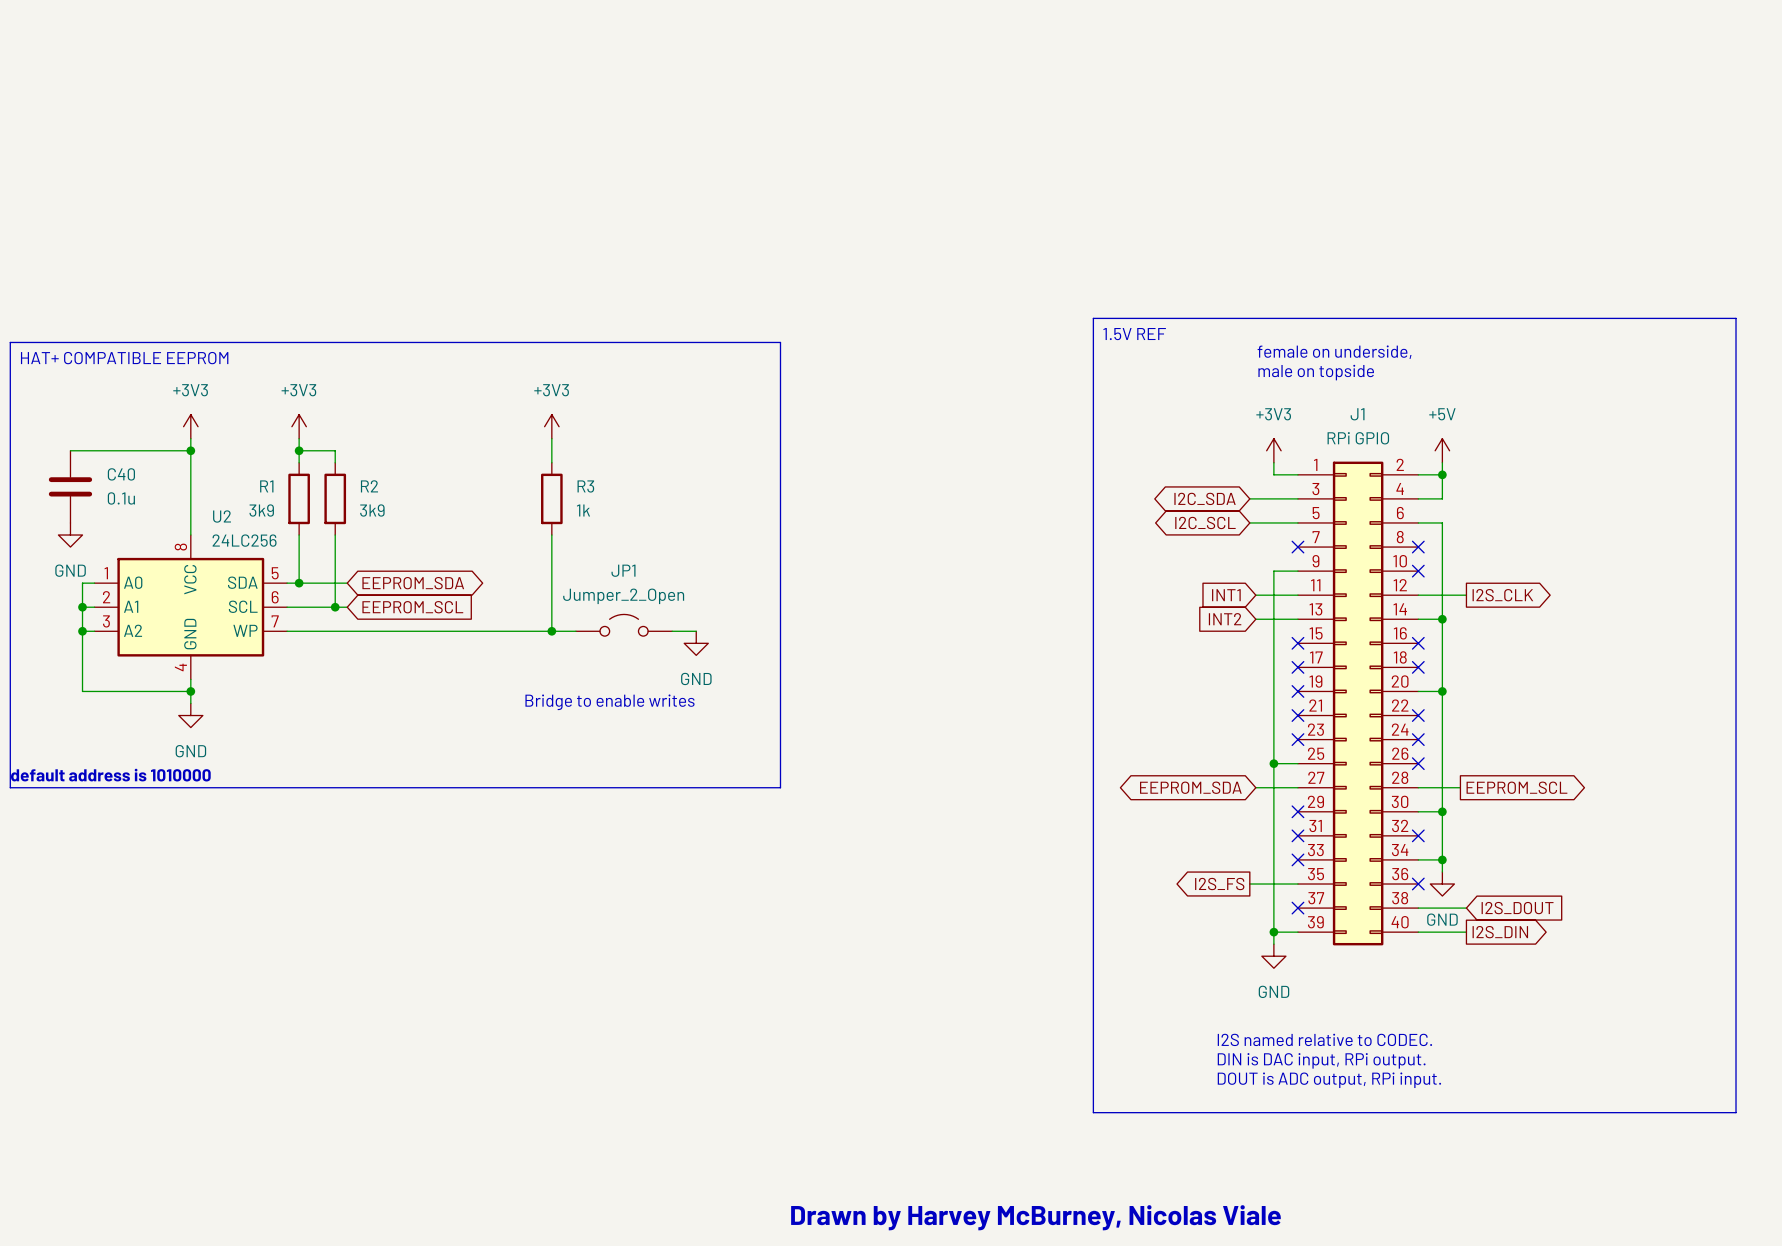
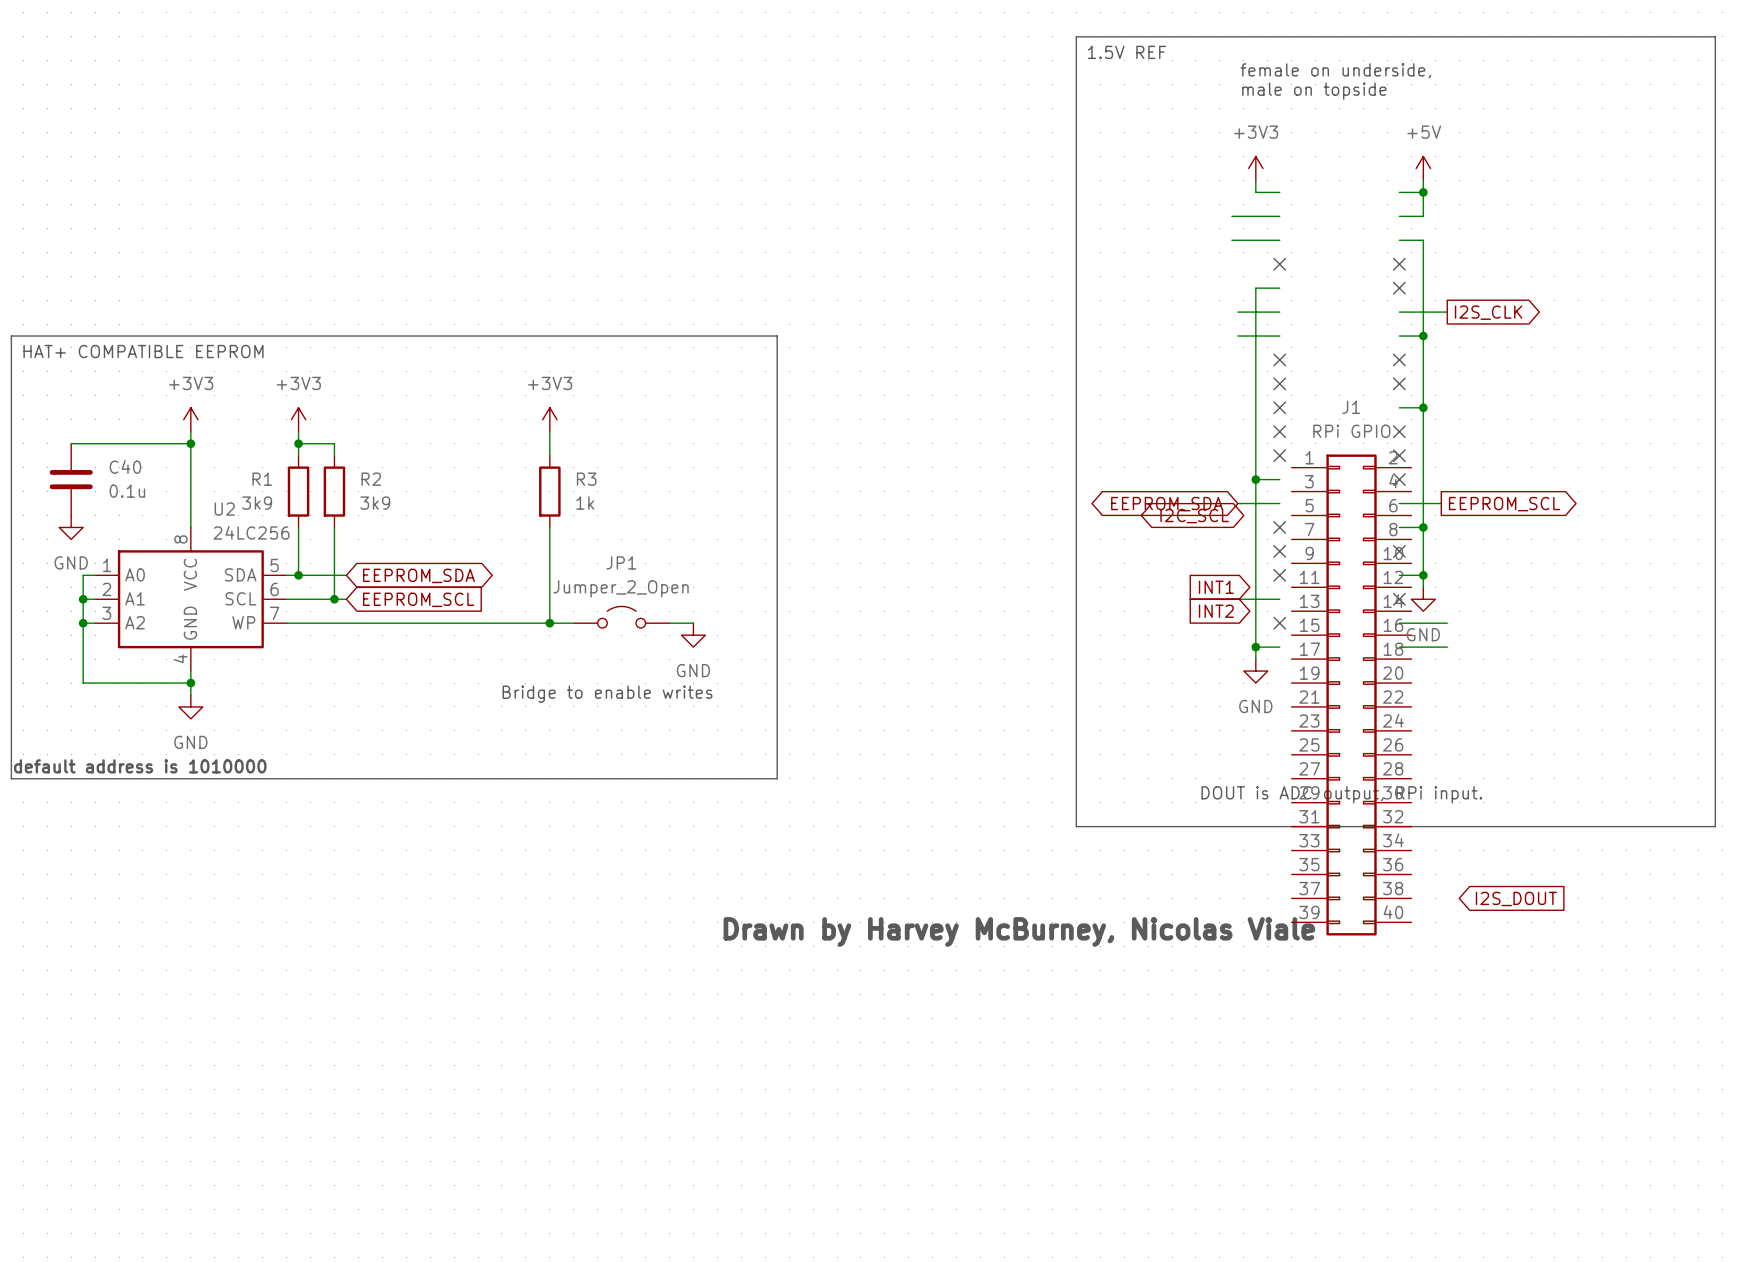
line: none -> (1076, 36) (1715, 36) (1715, 826) (1076, 826) (1076, 36)
text: none -> 1.5V REF (1126, 52)
text: none -> female on underside, (1335, 70)
text: none -> male on topside (1314, 91)
power symbol: none -> +3V3 (1255, 168)
power symbol: none -> +5V (1423, 168)
wire: none -> (1255, 180) (1255, 192) (1279, 192)
wire: none -> (1423, 180) (1423, 216) (1399, 216)
wire: none -> (1399, 192) (1423, 192)
junction: none -> (1423, 192)
wire: none -> (1231, 216) (1279, 216)
wire: none -> (1231, 240) (1279, 240)
wire: none -> (1399, 240) (1423, 240) (1423, 587)
no-connect mark: none -> (1279, 264)
no-connect mark: none -> (1399, 264)
wire: none -> (1279, 288) (1255, 288) (1255, 659)
no-connect mark: none -> (1399, 288)
line: (1093, 318) (1736, 318) (1736, 1112) (1093, 1112) (1093, 318) -> none
global label: none -> I2S_CLK (1488, 312)
text: 1.5V REF (1134, 334) -> none
wire: none -> (1237, 336) (1279, 336)
wire: none -> (1399, 336) (1423, 336)
junction: none -> (1423, 336)
text: female on underside, (1334, 352) -> none
no-connect mark: none -> (1279, 359)
no-connect mark: none -> (1399, 359)
text: male on topside (1316, 372) -> none
no-connect mark: none -> (1279, 383)
no-connect mark: none -> (1399, 383)
no-connect mark: none -> (1279, 407)
wire: none -> (1399, 407) (1423, 407)
junction: none -> (1423, 407)
no-connect mark: none -> (1279, 431)
no-connect mark: none -> (1399, 431)
power symbol: +3V3 (1273, 450) -> none
power symbol: +5V (1442, 450) -> none
wire: (1273, 462) (1273, 474) (1297, 474) -> none
no-connect mark: none -> (1279, 455)
no-connect mark: none -> (1399, 455)
wire: (1442, 462) (1442, 498) (1418, 498) -> none
wire: (1418, 474) (1442, 474) -> (1399, 527) (1423, 527)
junction: (1442, 474) -> none
junction: none -> (1255, 479)
no-connect mark: none -> (1399, 479)
global label: I2C_SDA (1205, 498) -> none
wire: (1249, 498) (1297, 498) -> (1231, 599) (1279, 599)
global label: none -> EEPROM_SDA (1167, 504)
global label: none -> EEPROM_SCL (1504, 504)
wire: (1249, 522) (1297, 522) -> (1399, 623) (1447, 623)
wire: (1418, 522) (1442, 522) (1442, 871) -> none
no-connect mark: none -> (1279, 527)
junction: none -> (1423, 527)
no-connect mark: (1297, 547) -> none
no-connect mark: (1418, 547) -> none
no-connect mark: none -> (1279, 551)
no-connect mark: none -> (1399, 551)
wire: (1297, 571) (1273, 571) (1273, 944) -> none
no-connect mark: (1418, 571) -> none
no-connect mark: none -> (1279, 575)
wire: (1255, 595) (1297, 595) -> (1399, 503) (1441, 503)
wire: (1418, 595) (1466, 595) -> (1399, 647) (1447, 647)
global label: I2S_CLK (1502, 595) -> none
no-connect mark: none -> (1399, 599)
power symbol: none -> GND (1423, 599)
wire: (1255, 619) (1297, 619) -> (1237, 503) (1279, 503)
wire: (1418, 619) (1442, 619) -> (1255, 479) (1279, 479)
junction position: (1442, 619) -> (1423, 575)
no-connect mark position: (1297, 643) -> (1279, 623)
no-connect mark: (1418, 643) -> none
junction: none -> (1255, 647)
no-connect mark: (1297, 667) -> none
no-connect mark: (1418, 667) -> none
power symbol: none -> GND (1255, 671)
no-connect mark: (1297, 691) -> none
wire: (1418, 691) (1442, 691) -> (1399, 575) (1423, 575)
junction: (1442, 691) -> none
no-connect mark: (1297, 715) -> none
no-connect mark: (1418, 715) -> none
no-connect mark: (1297, 739) -> none
no-connect mark: (1418, 739) -> none
wire: (1273, 763) (1297, 763) -> (1255, 647) (1279, 647)
junction: (1273, 763) -> none
no-connect mark: (1418, 763) -> none
global label: EEPROM_SDA (1190, 787) -> none
wire: (1255, 787) (1297, 787) -> none
wire: (1418, 787) (1460, 787) -> none
global label: EEPROM_SCL (1516, 787) -> none
text: none -> DOUT is ADC output, RPi input. (1341, 794)
no-connect mark: (1297, 811) -> none
wire: (1418, 811) (1442, 811) -> none
junction: (1442, 811) -> none
no-connect mark: (1297, 835) -> none
no-connect mark: (1418, 835) -> none
no-connect mark: (1297, 859) -> none
wire: (1418, 859) (1442, 859) -> none
junction: (1442, 859) -> none
global label: I2S_FS (1219, 884) -> none
wire: (1249, 884) (1297, 884) -> none
no-connect mark: (1418, 884) -> none
power symbol: GND (1442, 884) -> none
no-connect mark: (1297, 908) -> none
wire: (1418, 908) (1466, 908) -> none
wire: (1273, 932) (1297, 932) -> none
junction: (1273, 932) -> none
wire: (1418, 932) (1466, 932) -> none
global label: I2S_DIN (1500, 932) -> none
text: none -> Drawn by Harvey McBurney, Nicolas Viale (1019, 931)
power symbol: GND (1273, 956) -> none
text: I2S named relative to CODEC. (1324, 1039) -> none
text: DIN is DAC input, RPi output. (1321, 1060) -> none
text: DOUT is ADC output, RPi input. (1329, 1080) -> none
text: Drawn by Harvey McBurney, Nicolas Viale (1035, 1217) -> none

